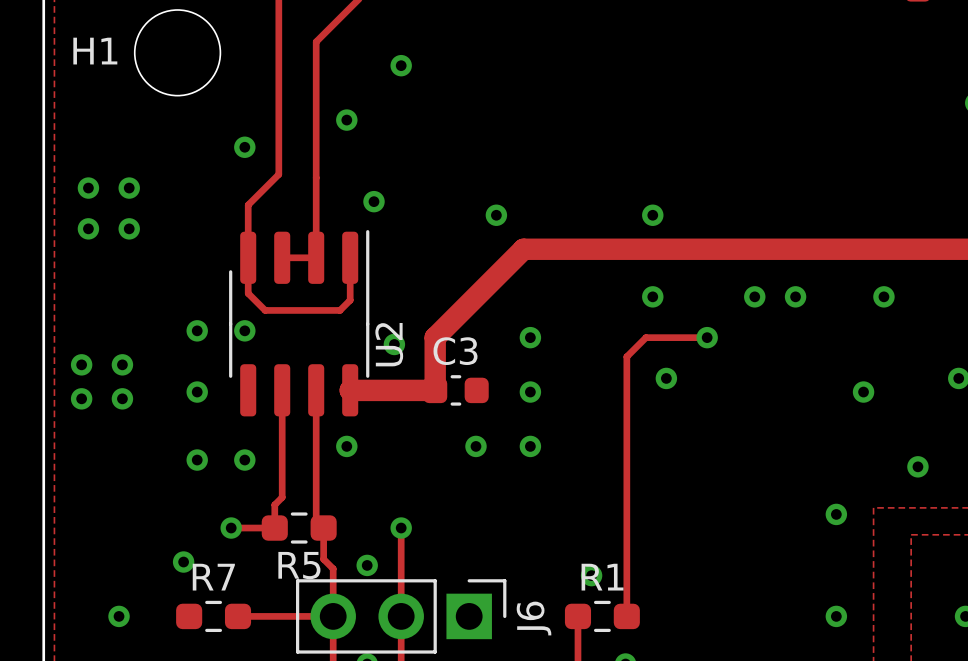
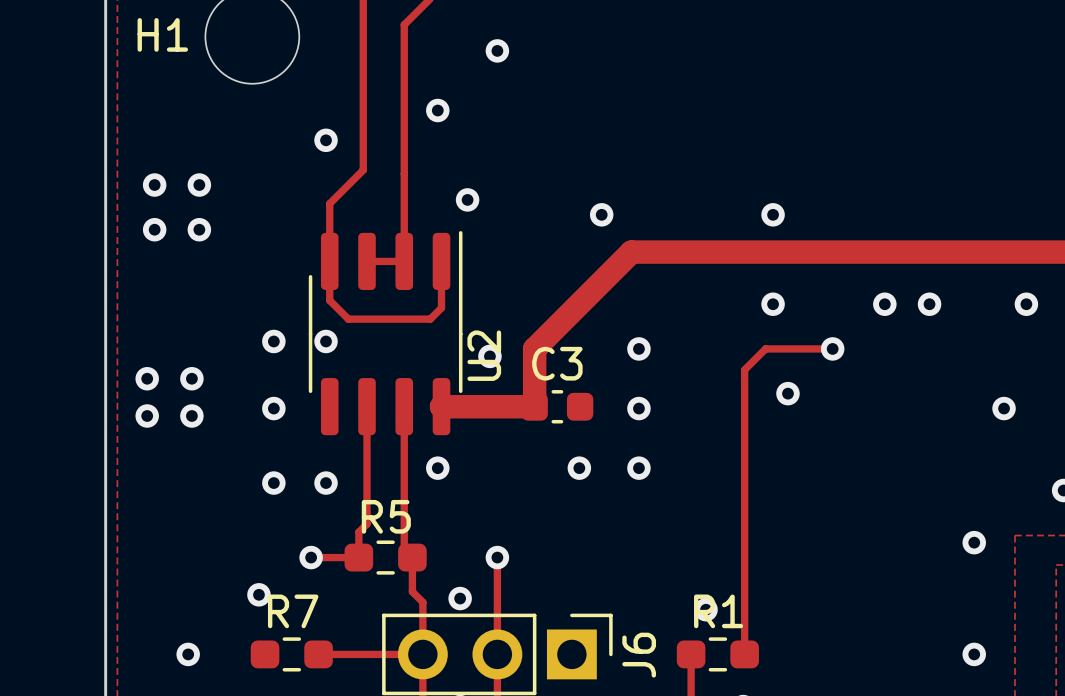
R5 name position: R5 (299, 565) -> R5 (386, 516)

